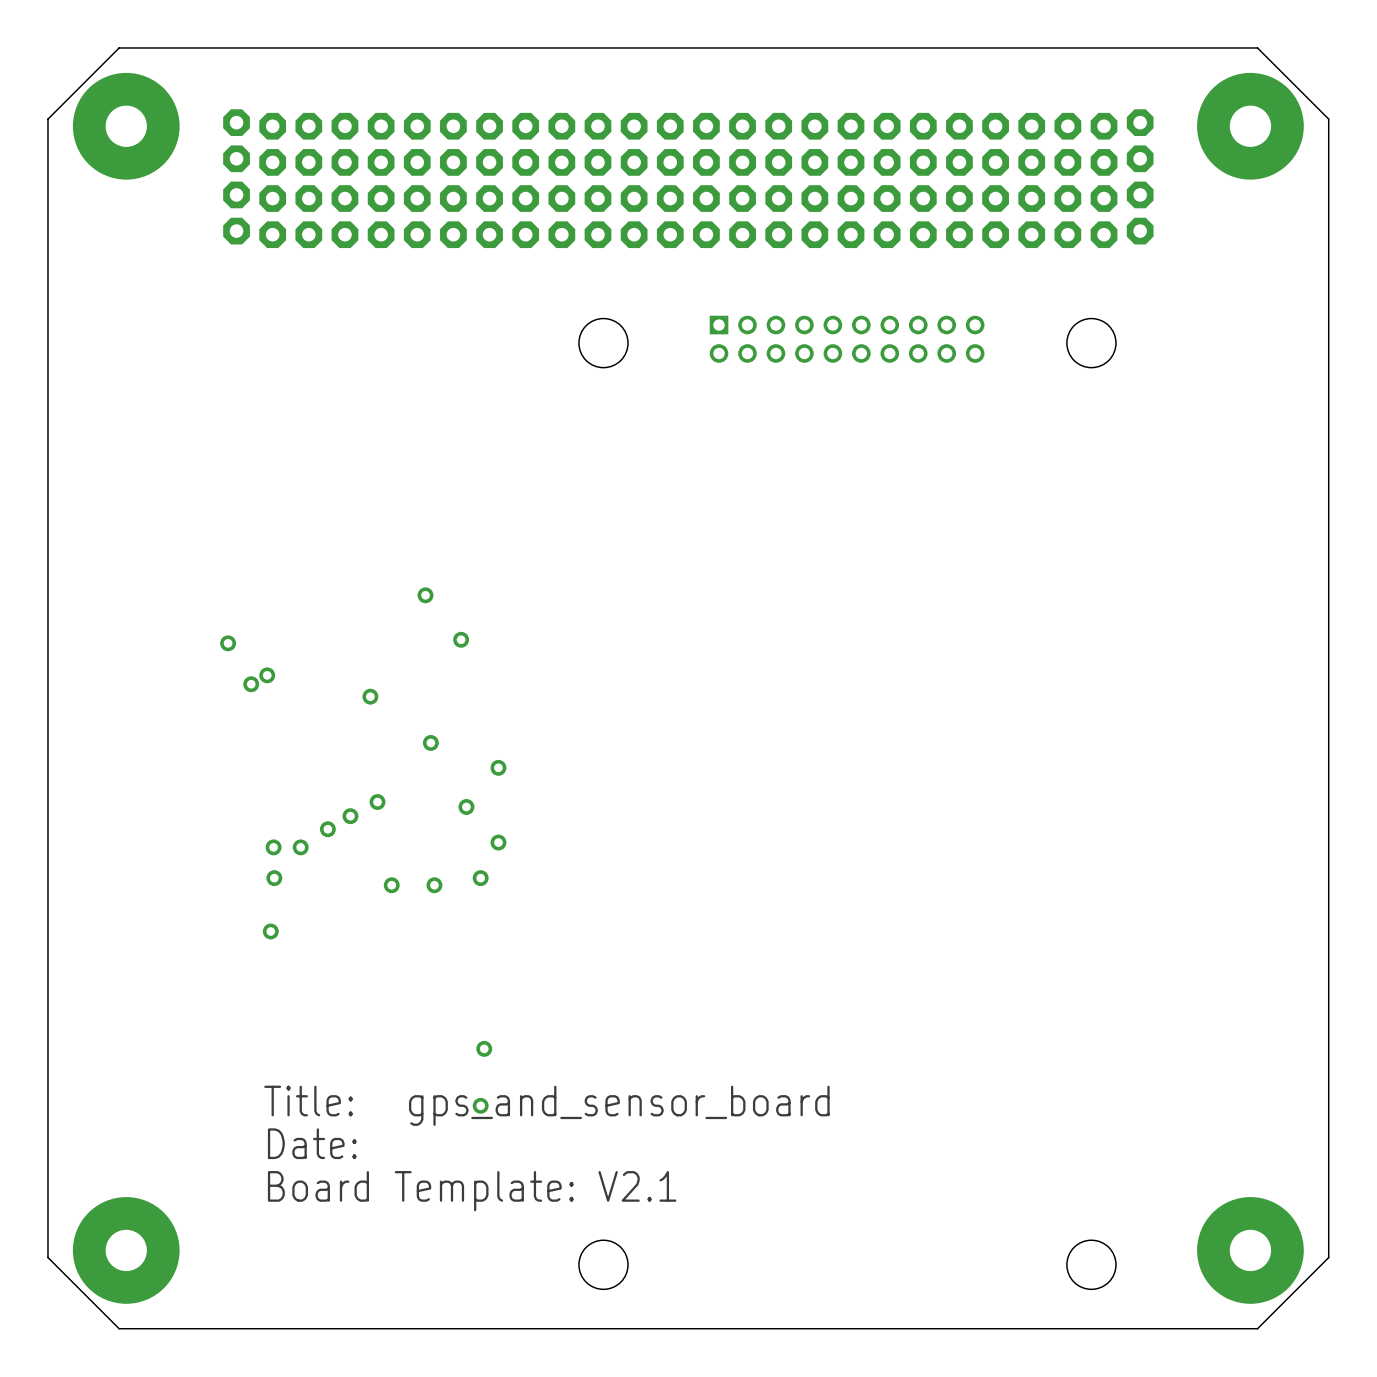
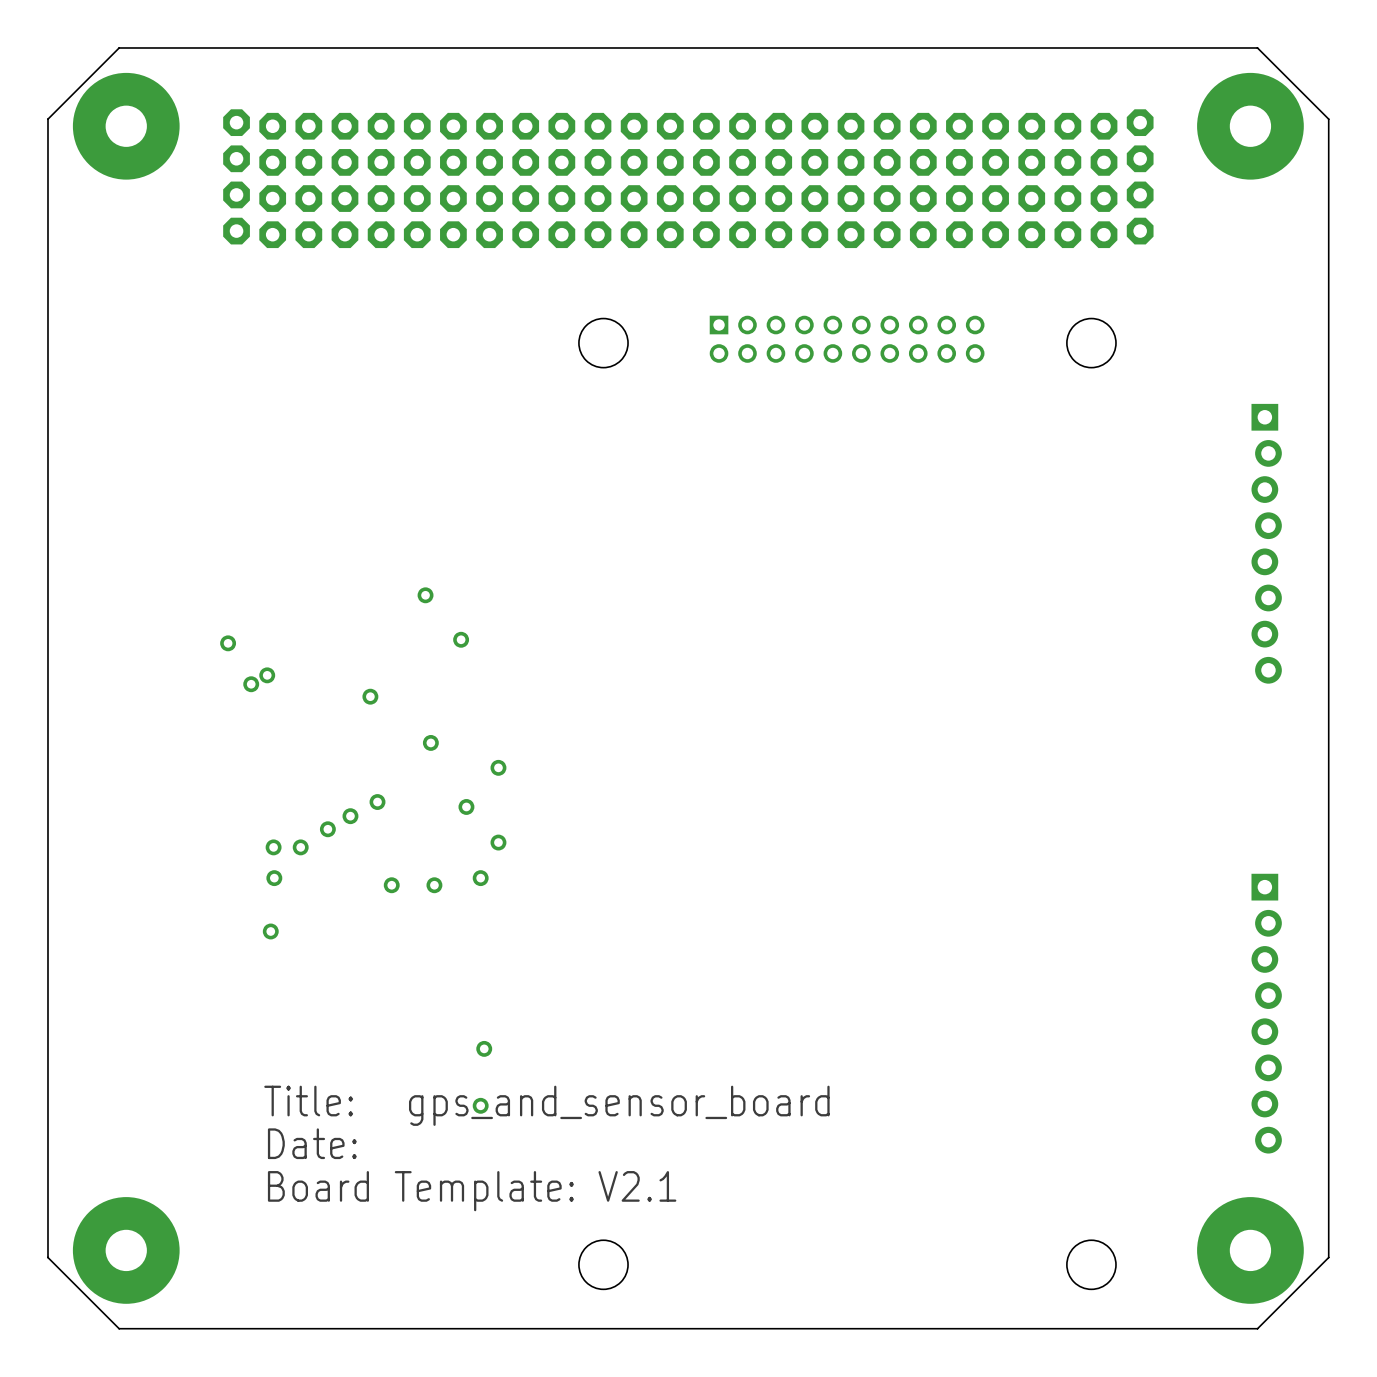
part: none -> (1266, 543)
part: none -> (1266, 1013)

